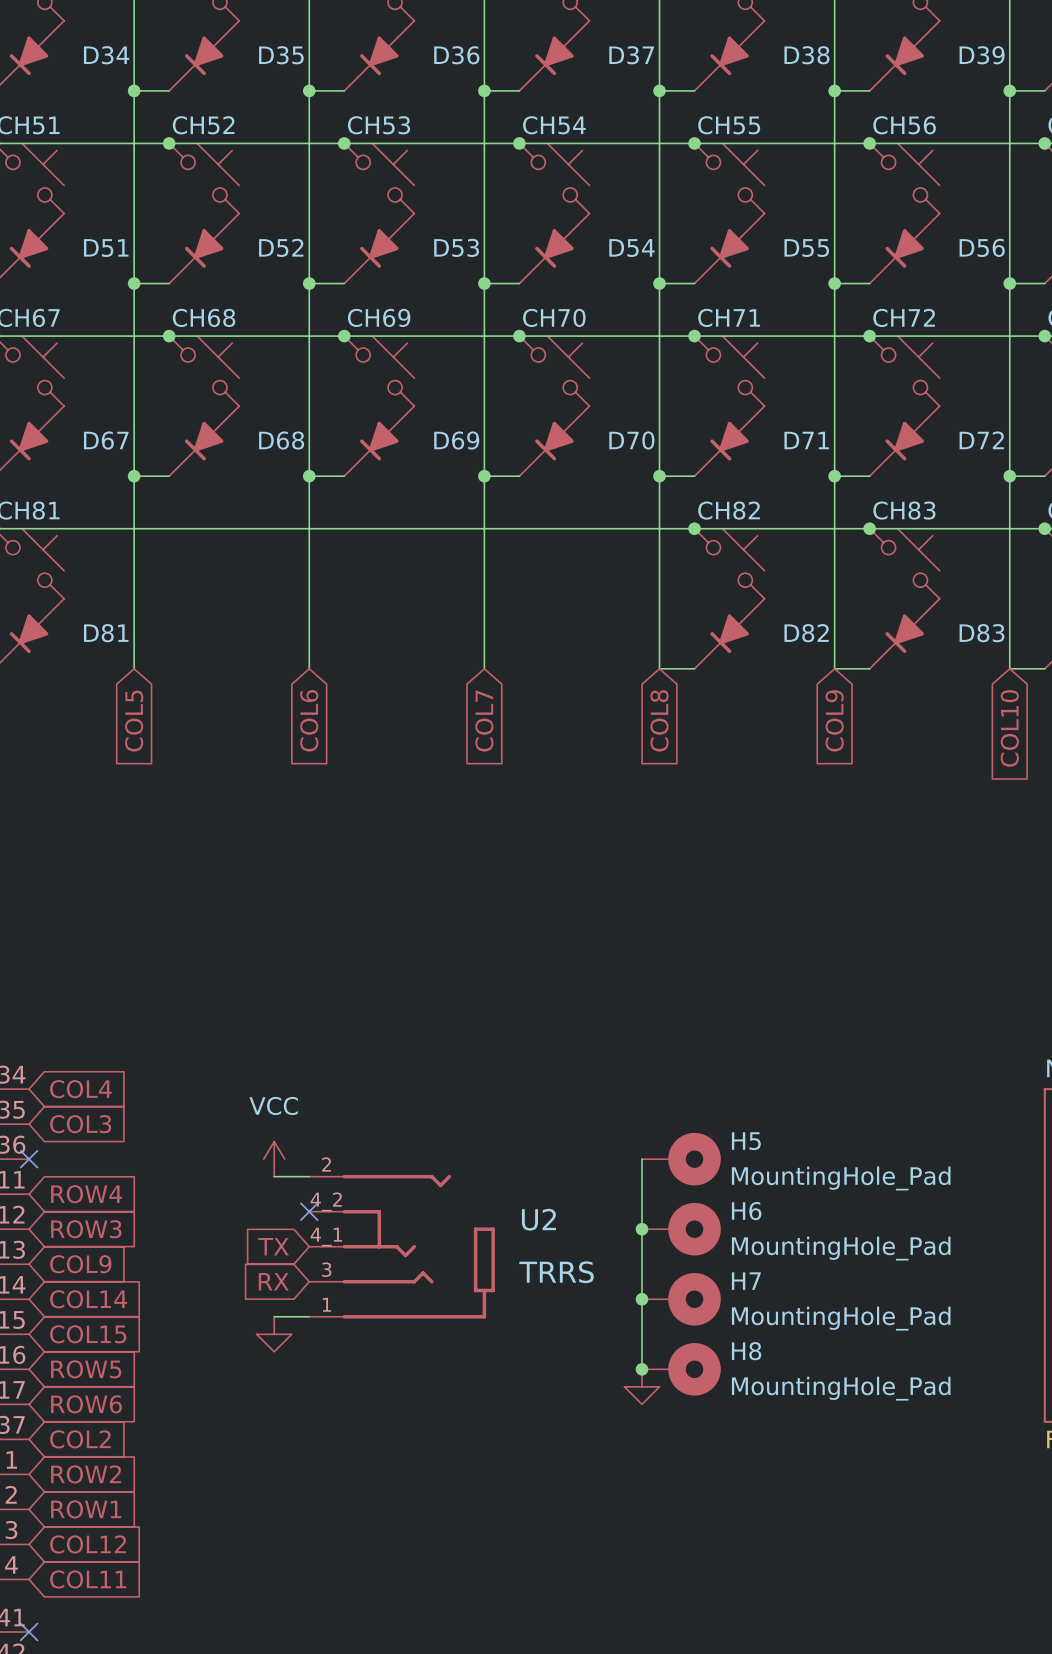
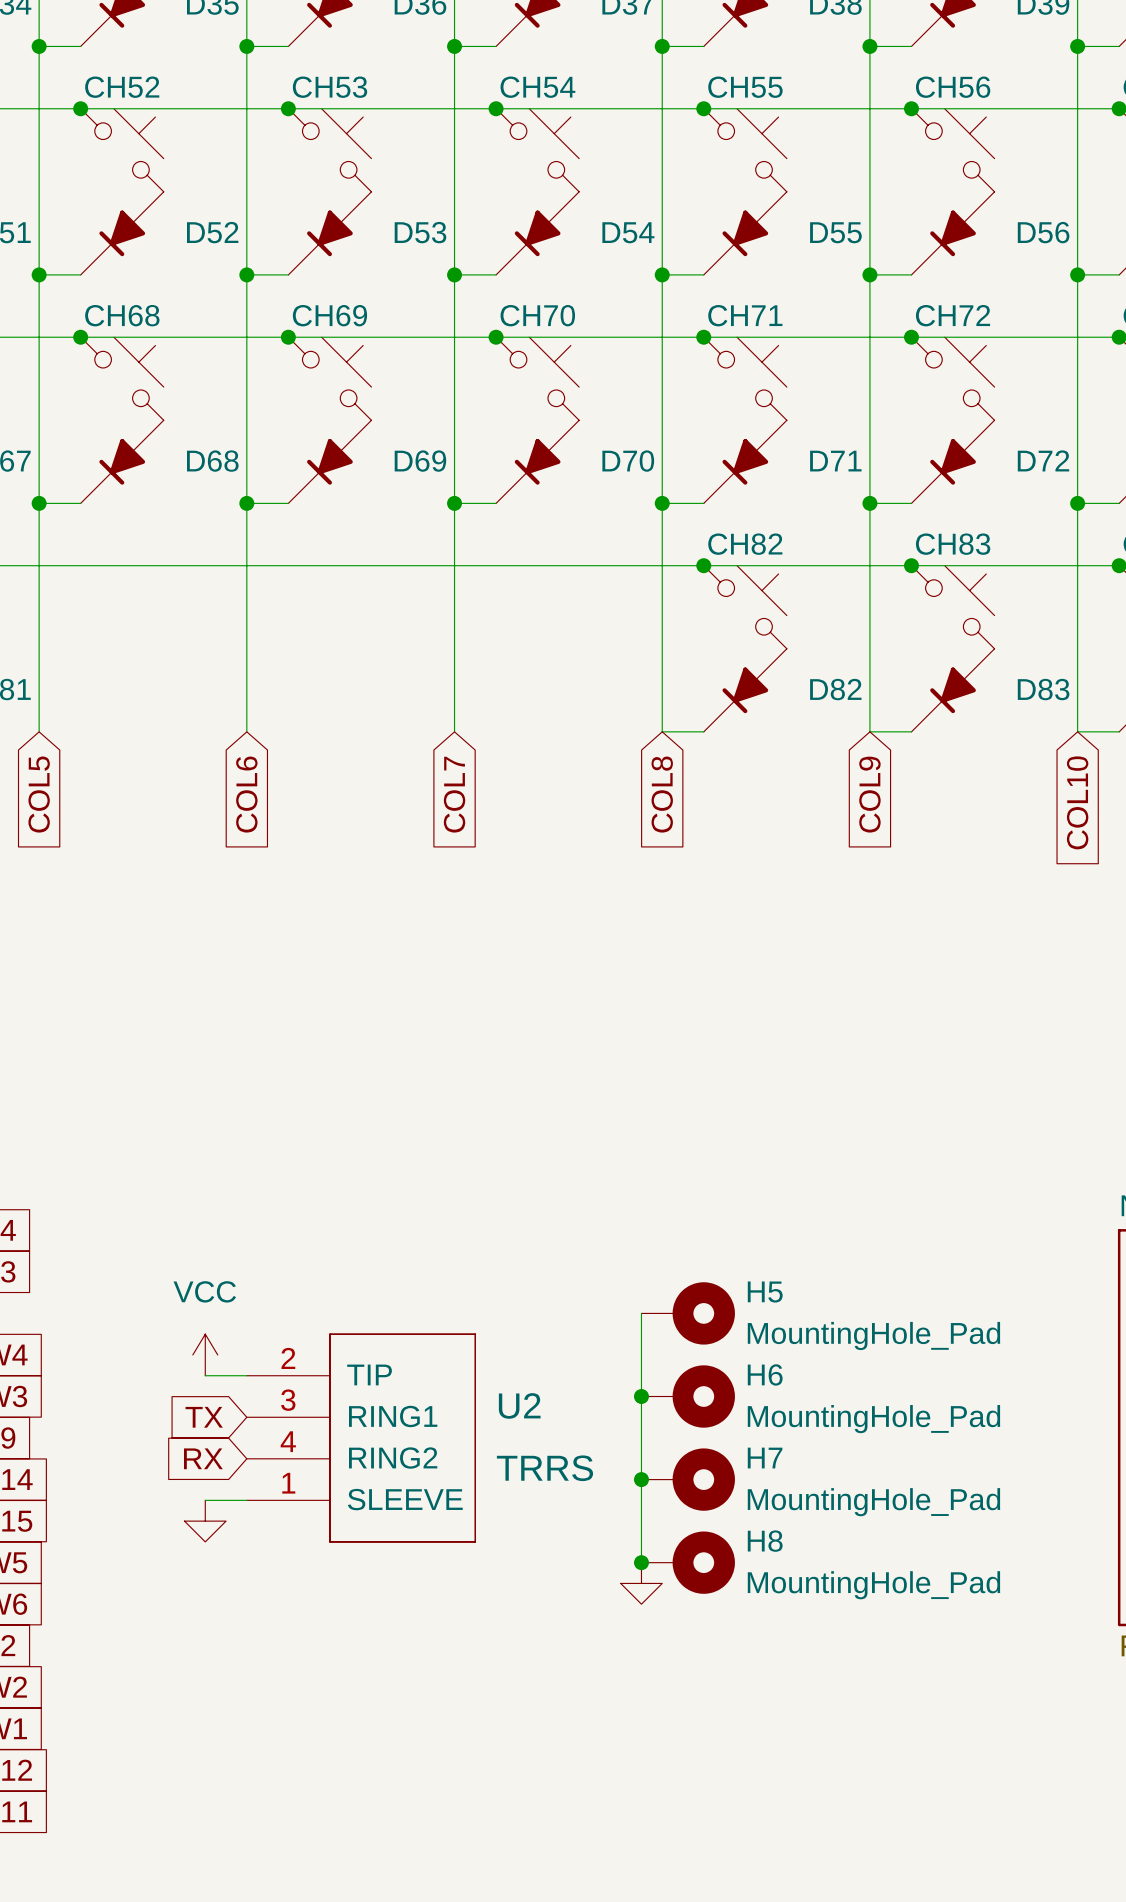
power symbol position: VCC (274, 1159) -> VCC (205, 1354)
U2 symbol: [309, 1174, 495, 1319] -> [246, 1334, 476, 1542]
wire: (274, 1176) (309, 1176) -> (205, 1375) (246, 1375)
no-connect mark: (309, 1211) -> none

